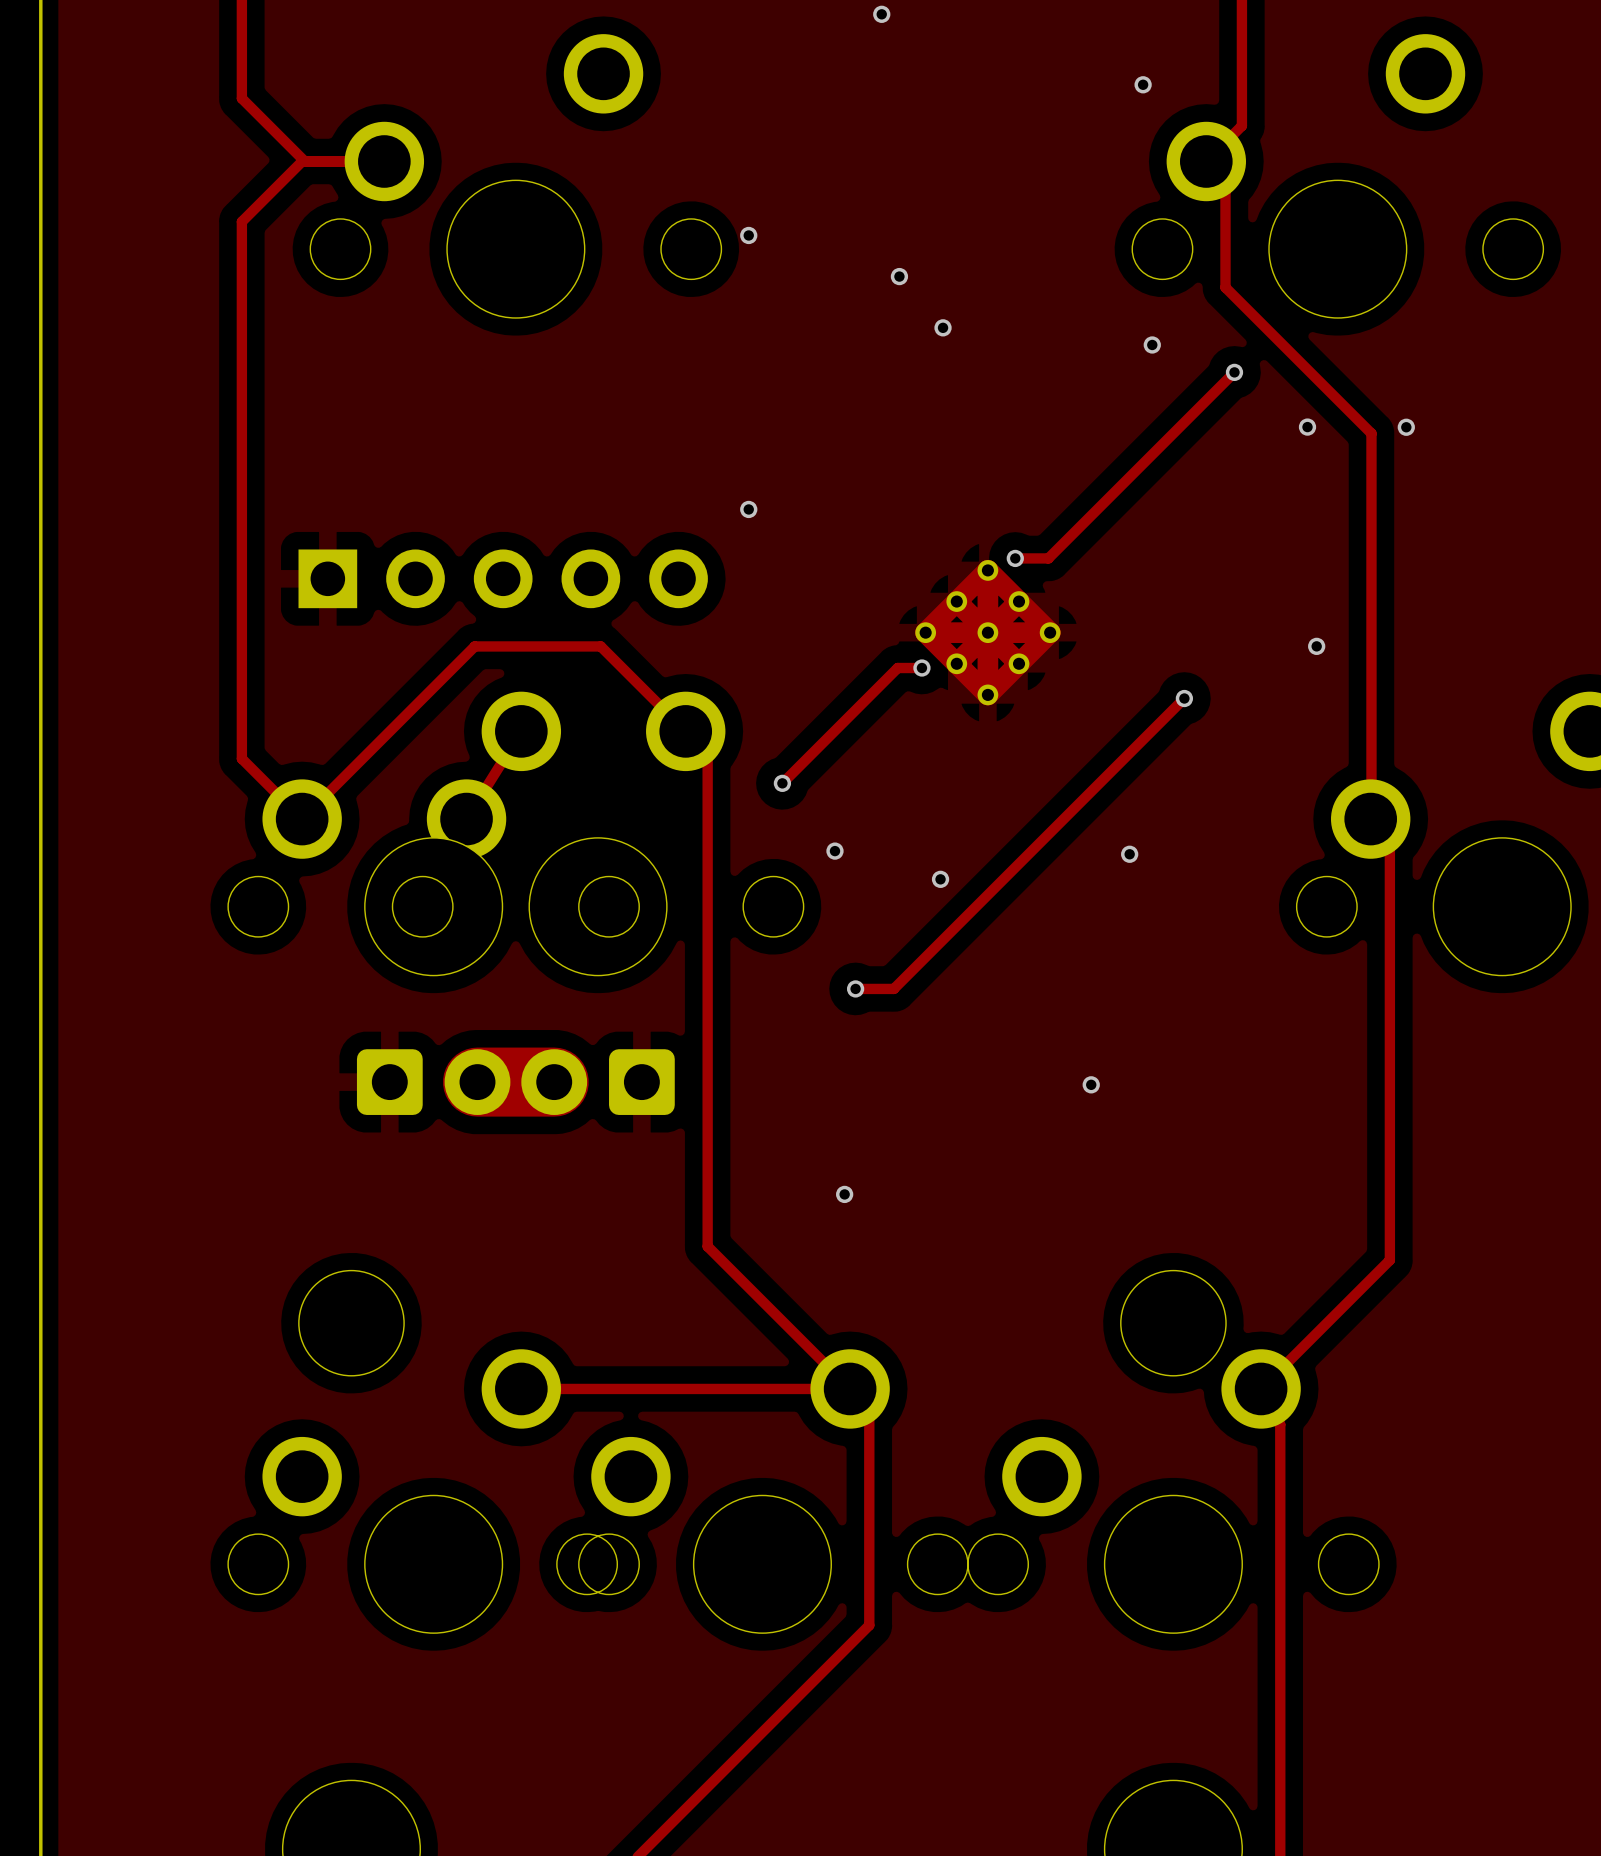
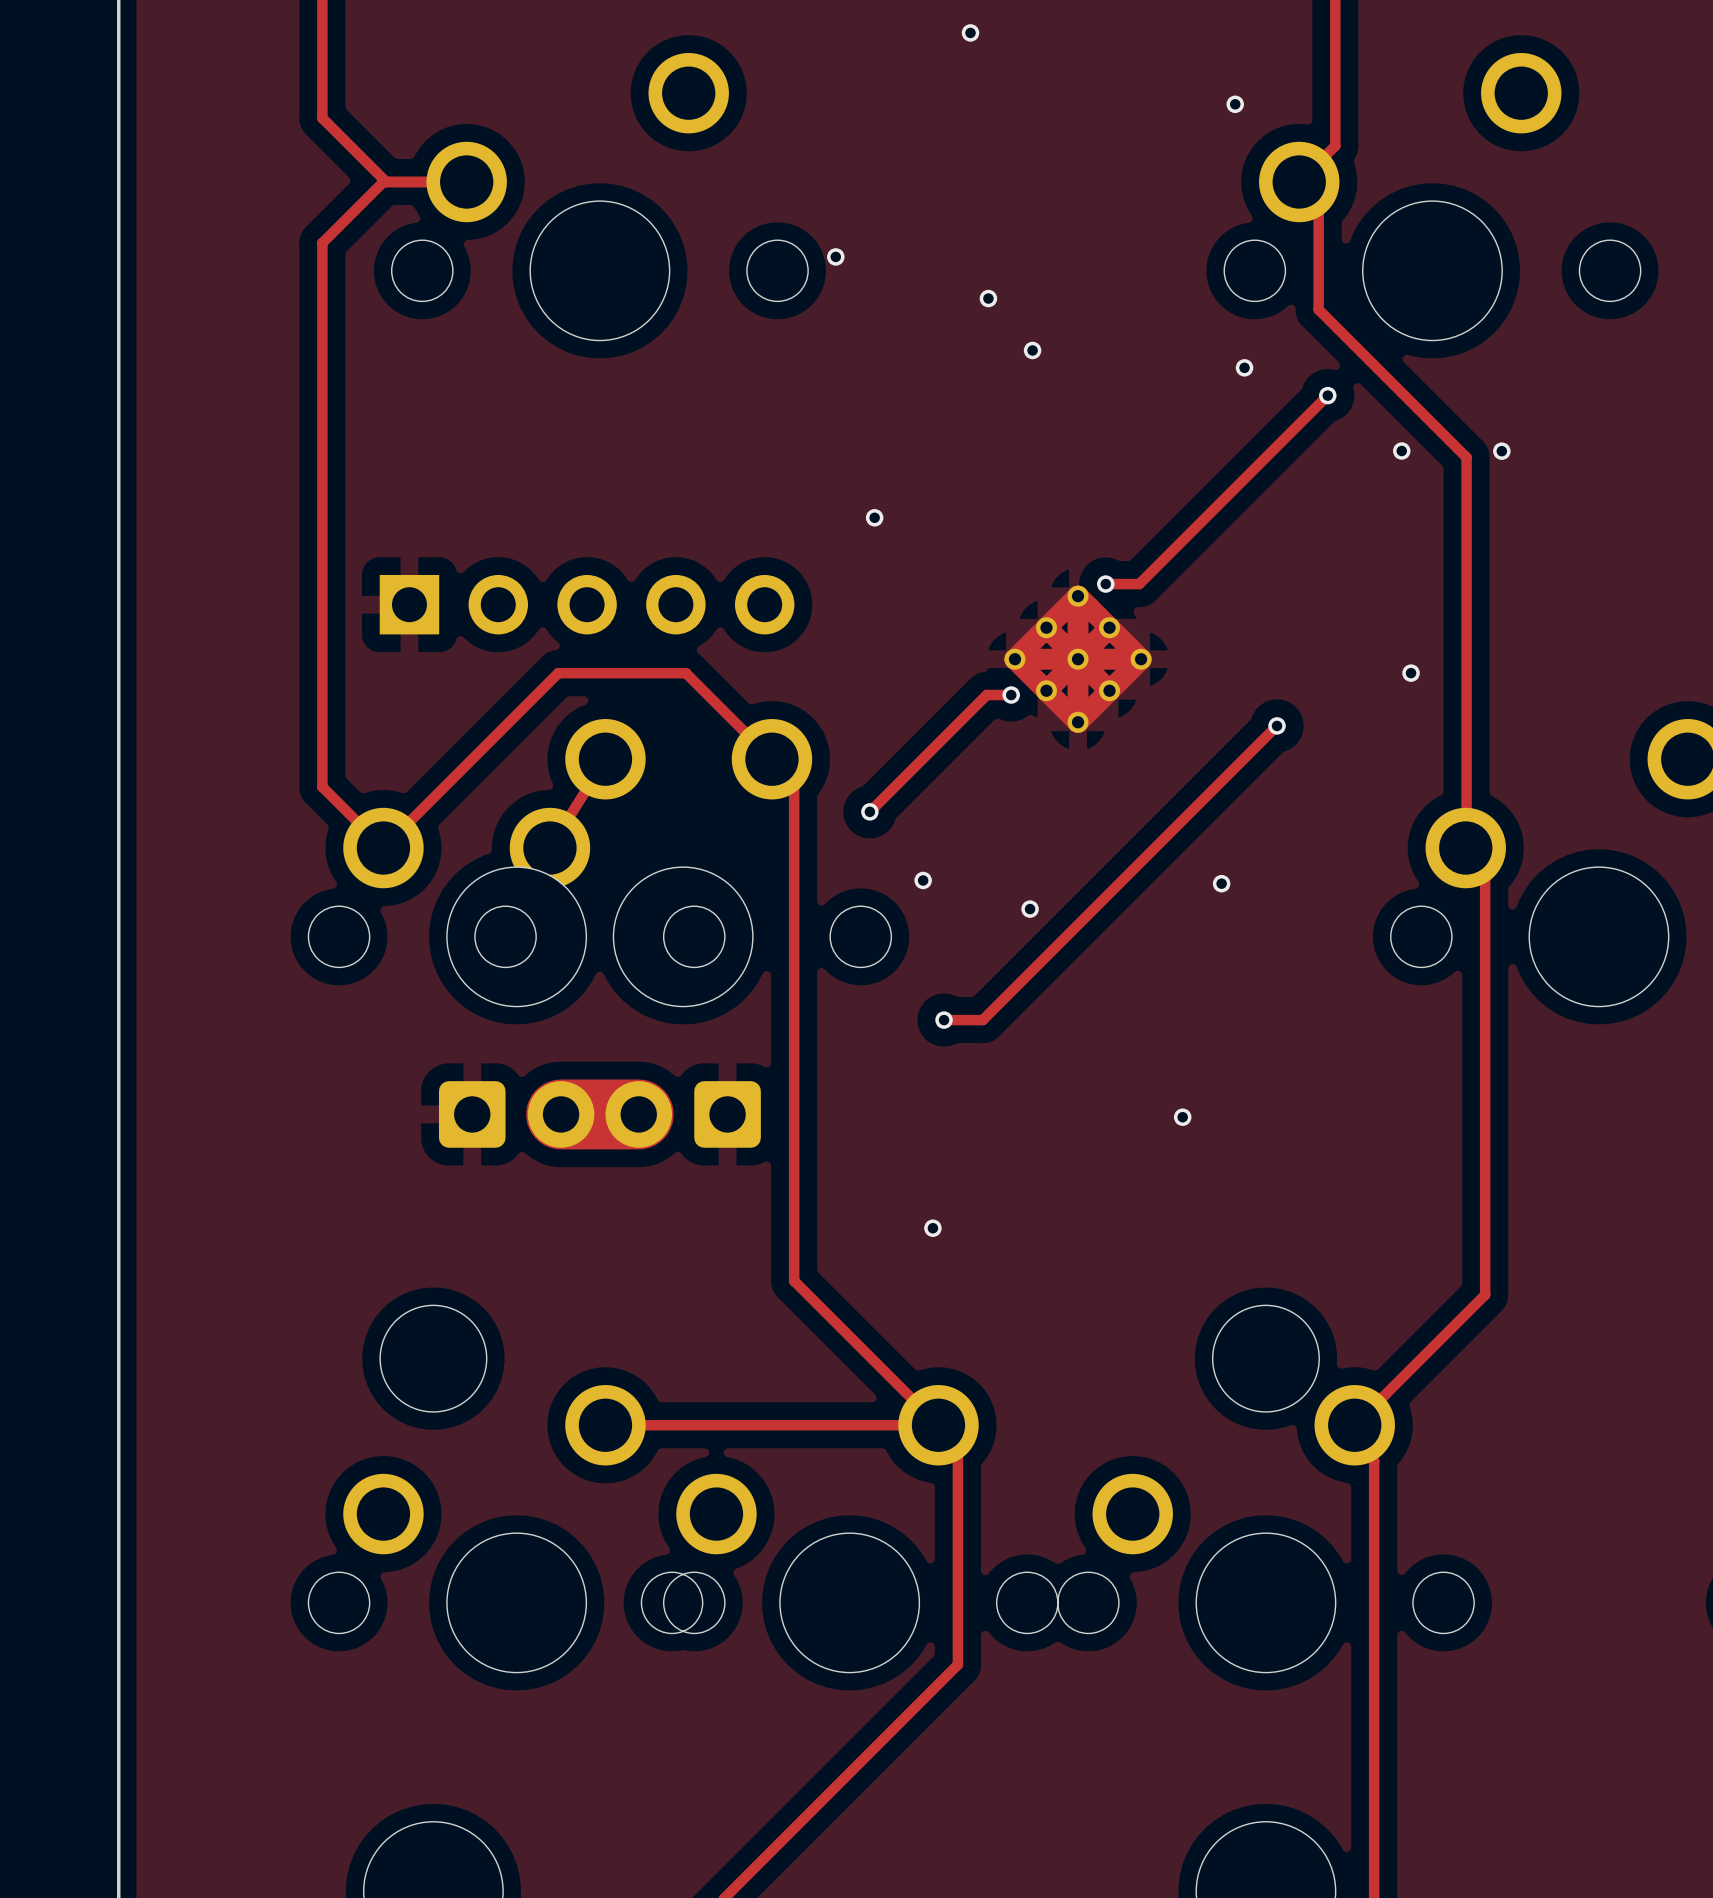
via position: (748, 509) -> (874, 517)

